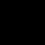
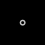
via: none -> (22, 22)

